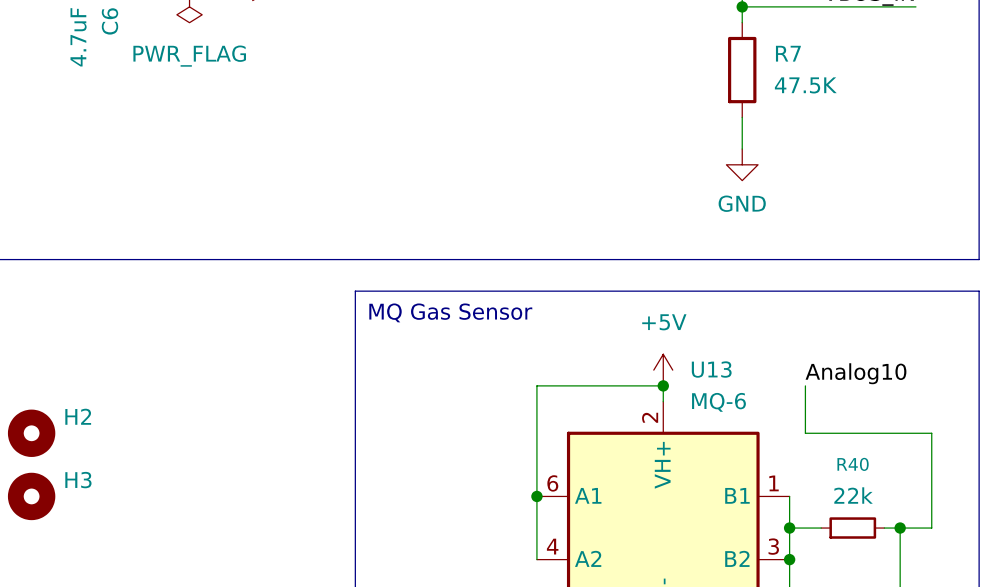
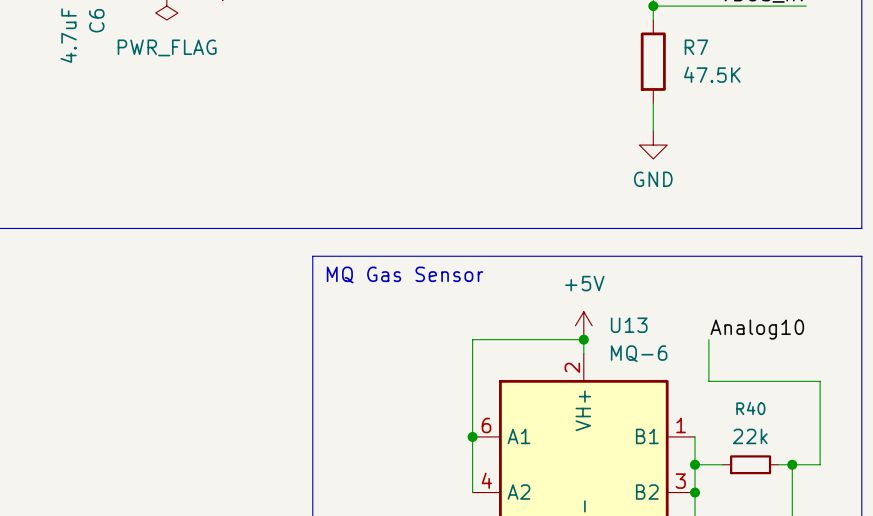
H2: (31, 433) -> none
H3: (31, 496) -> none

